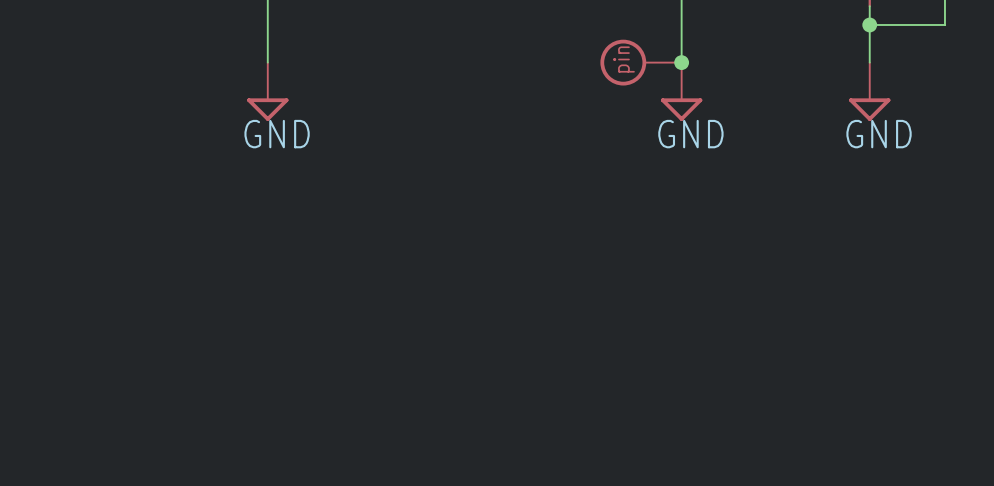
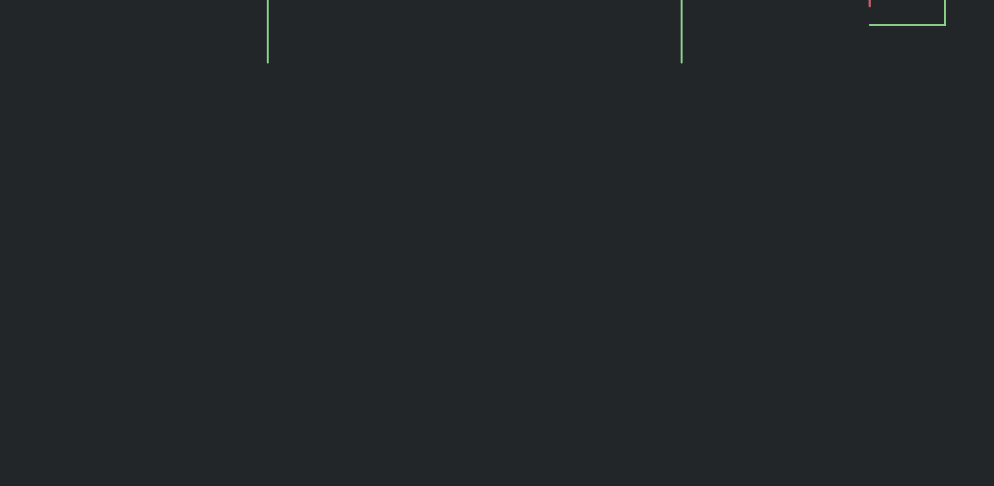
wire: (869, 6) (869, 62) -> none
junction: (869, 24) -> none
part: (641, 62) -> none
junction: (681, 62) -> none
power symbol: GND (267, 91) -> none
power symbol: GND (681, 91) -> none
power symbol: GND (869, 91) -> none

